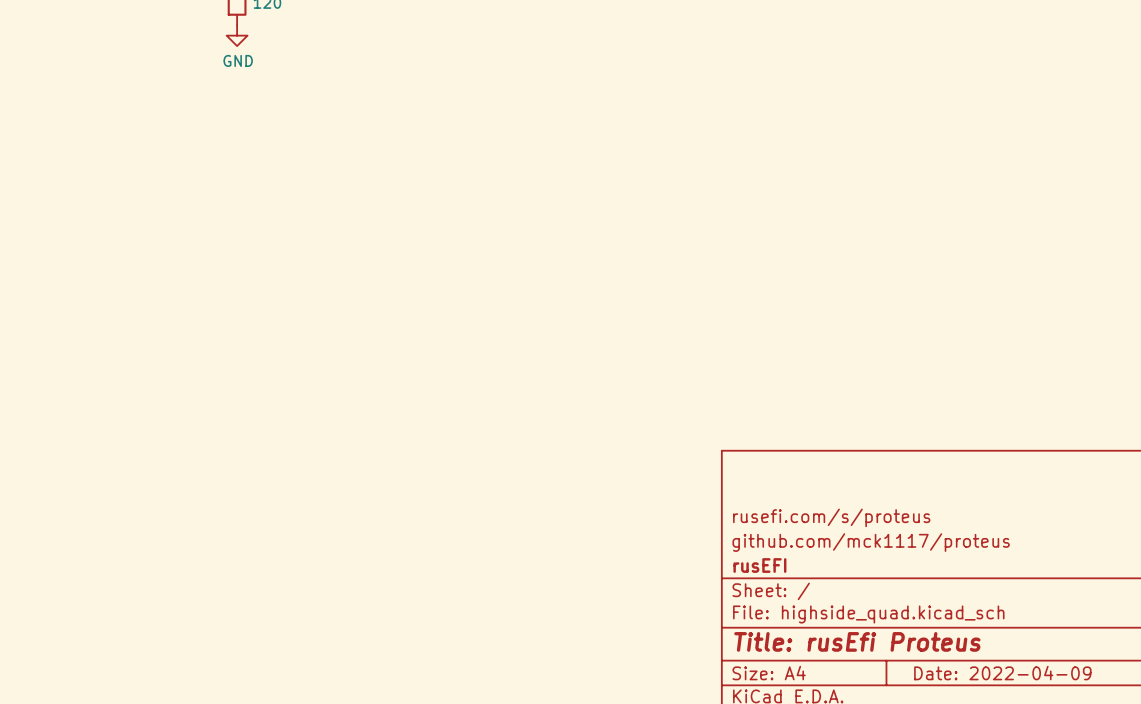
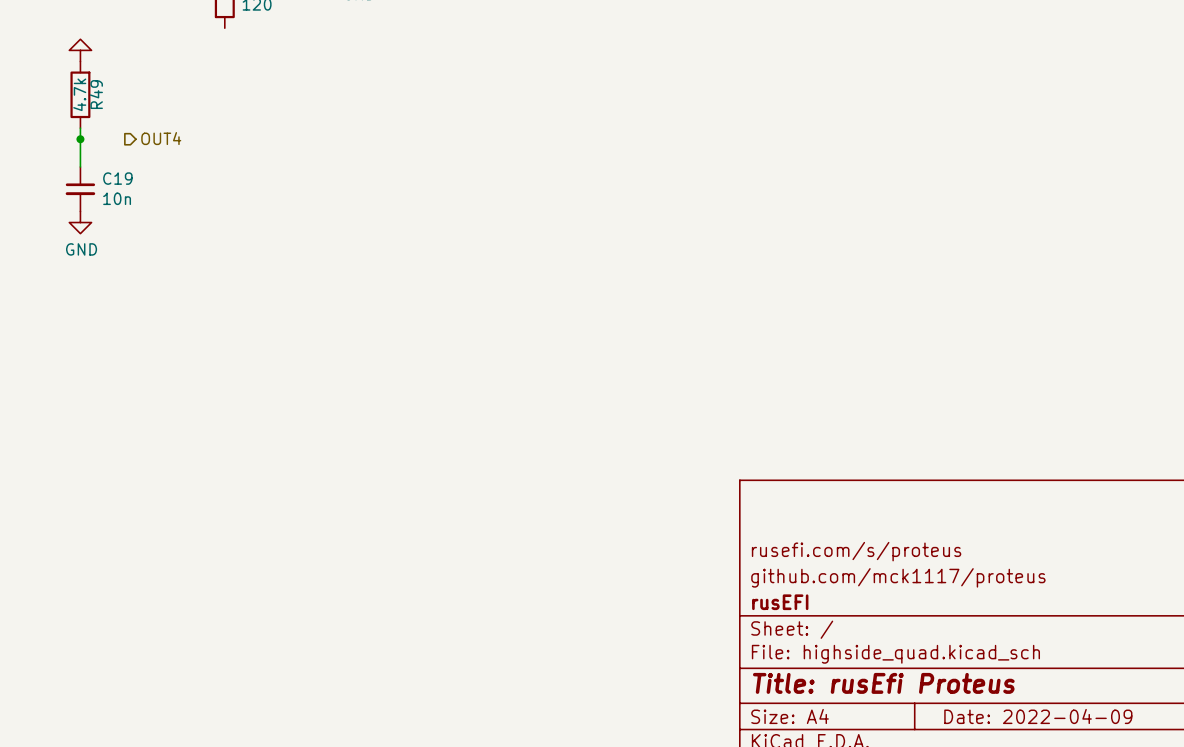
power symbol: GND (237, 35) -> none
power symbol: none -> (80, 50)
R49: none -> 4.7k (80, 94)
wire: none -> (80, 128) (80, 167)
junction: none -> (80, 139)
hierarchical label: none -> OUT4 (161, 138)
C19: none -> 10n (80, 189)
power symbol: none -> GND (80, 222)

